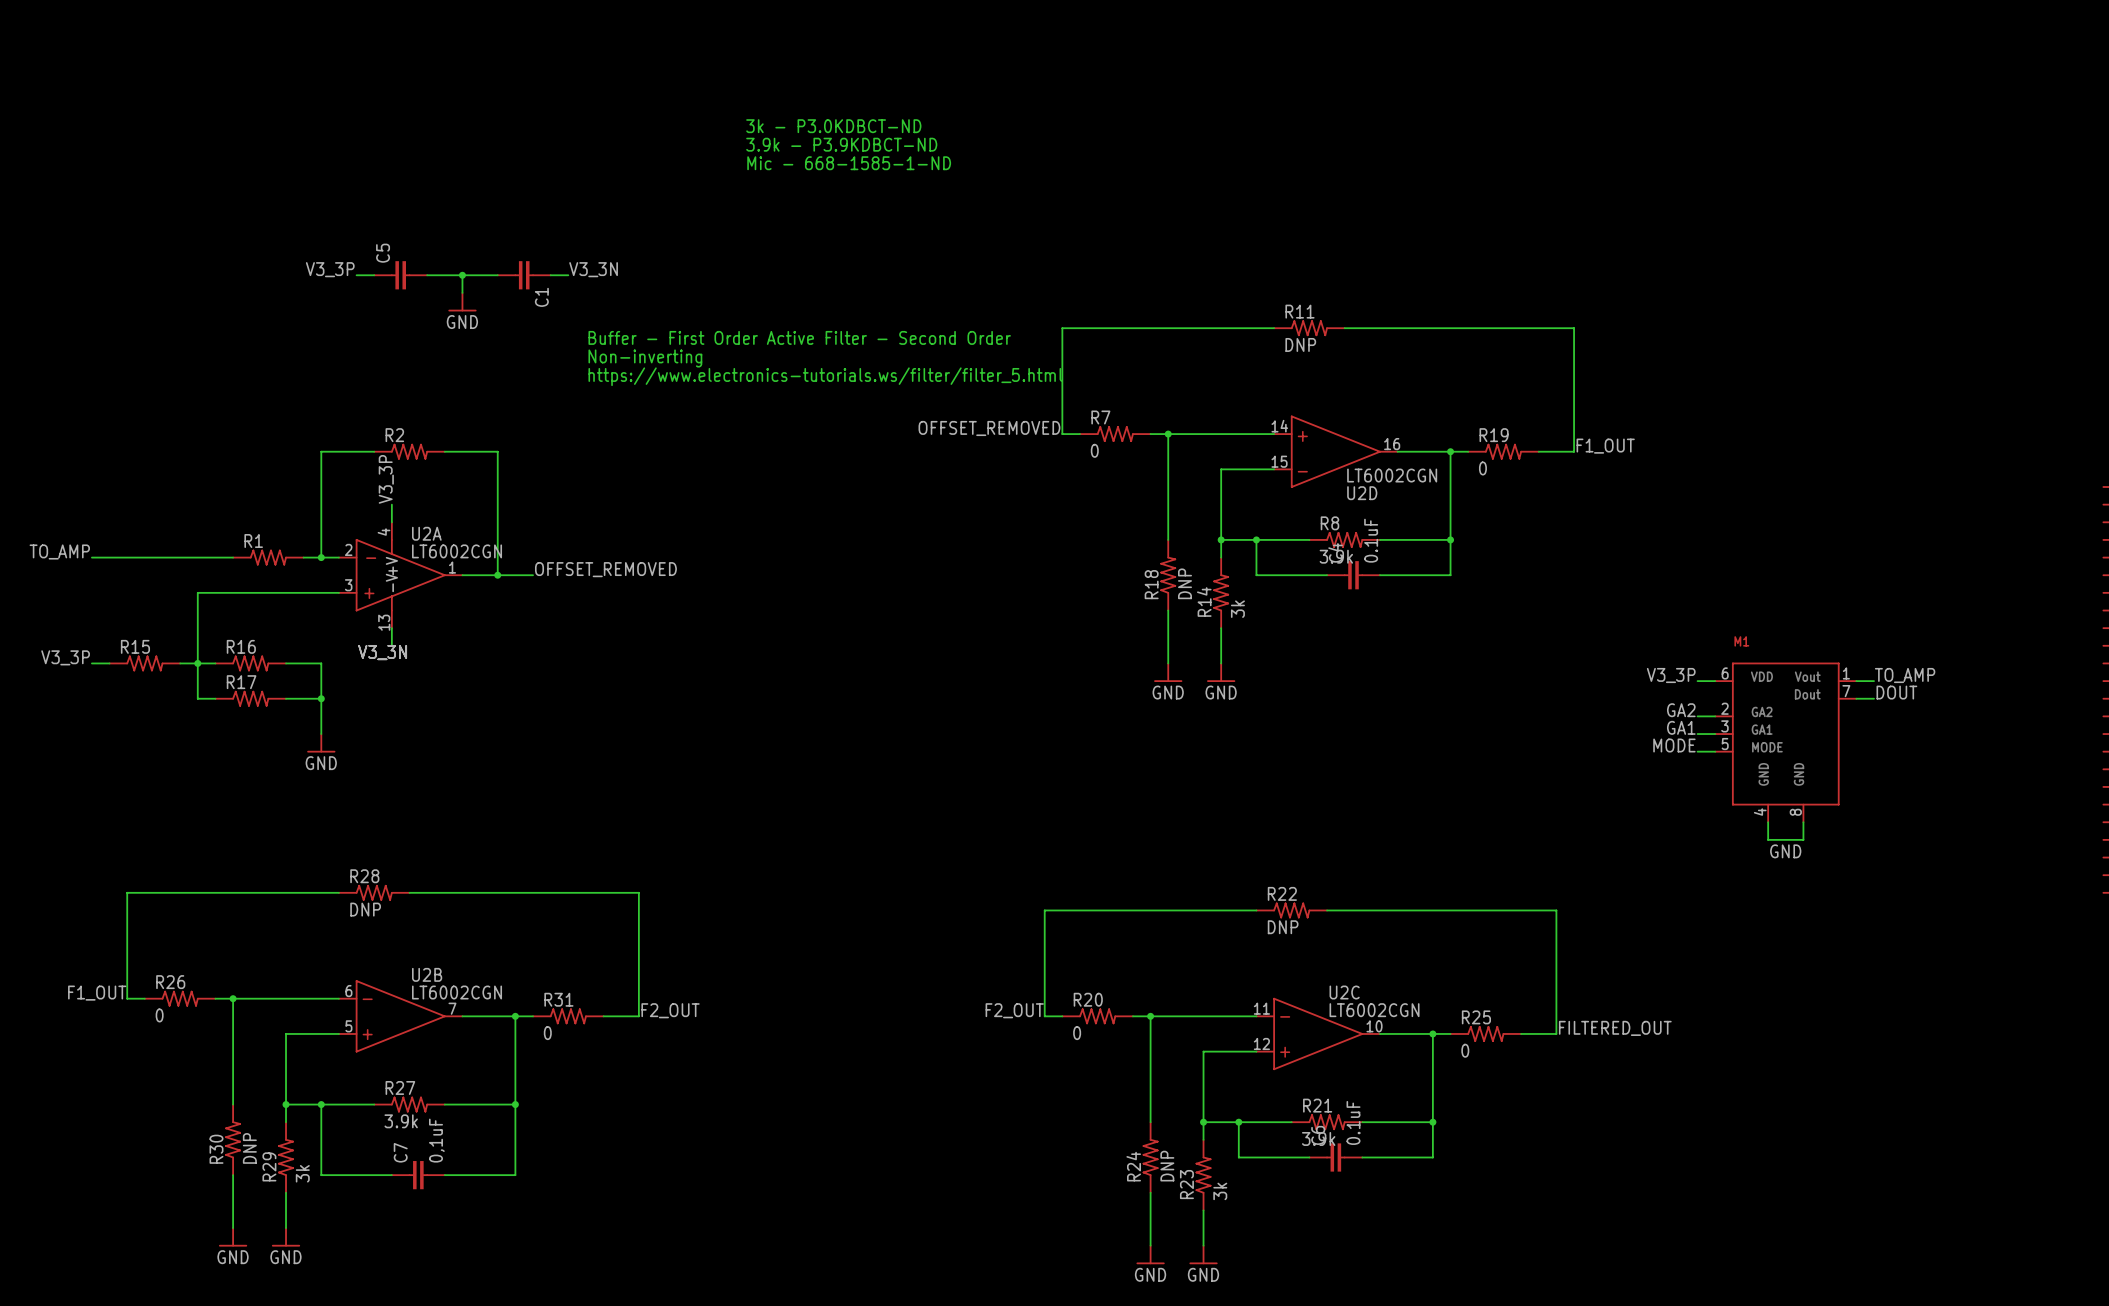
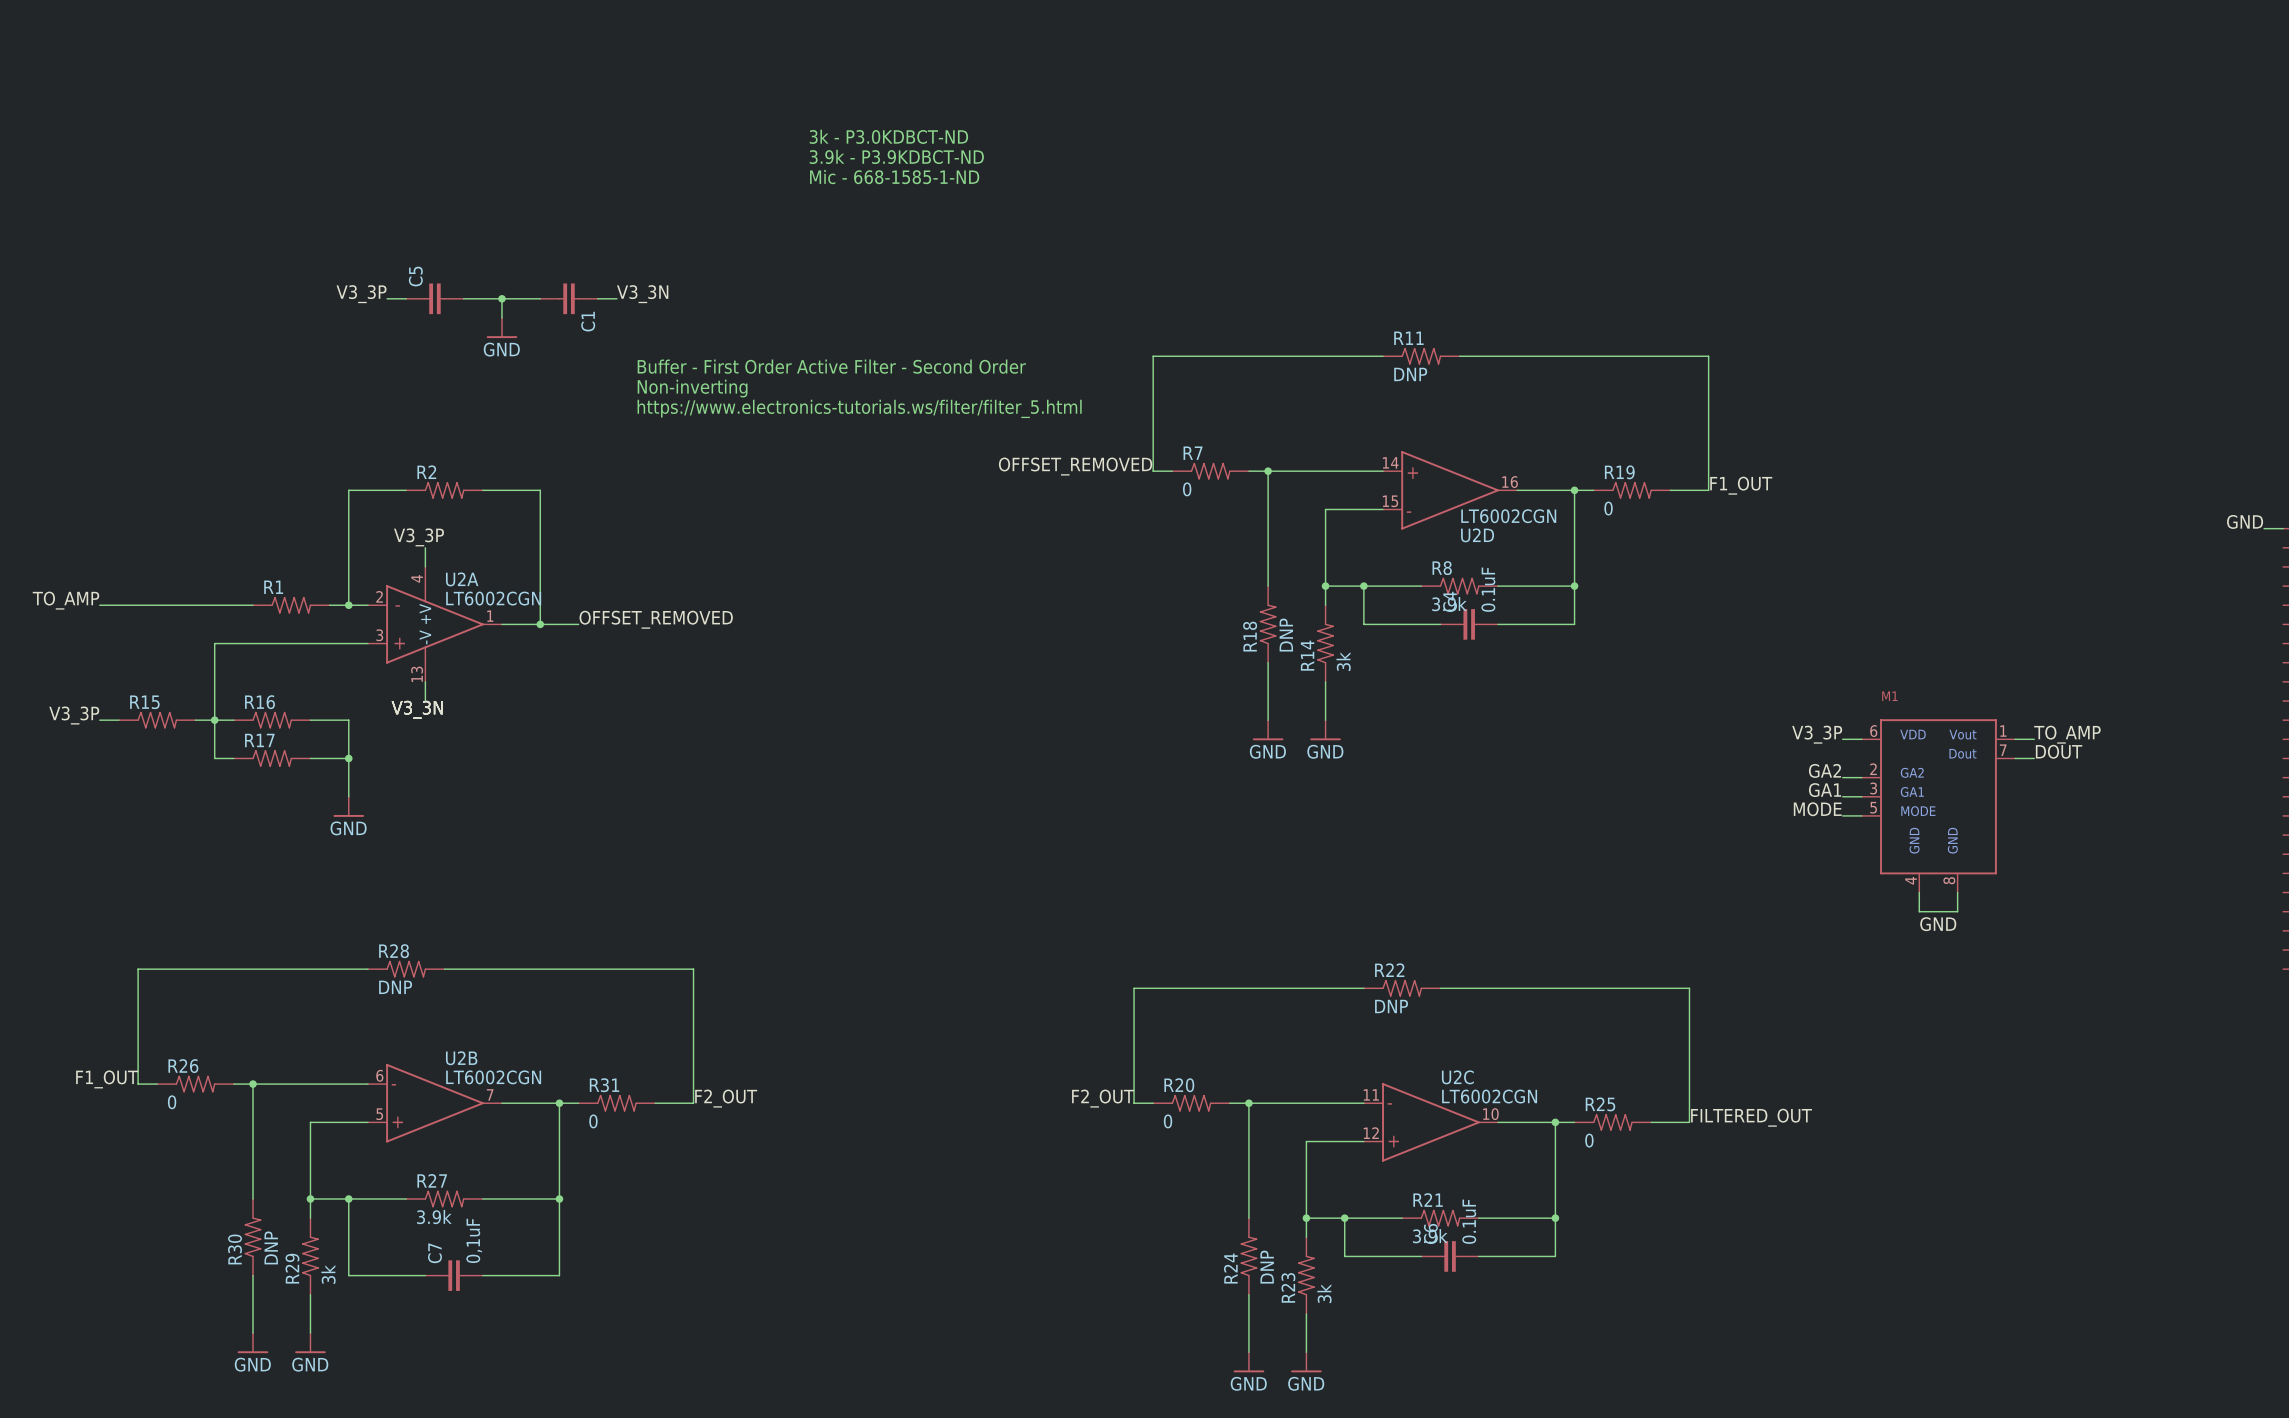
label rotation: 0° (386, 479) -> 90° clockwise (419, 537)
label: none -> GND (2245, 521)
wire: none -> (2264, 528) (2283, 528)

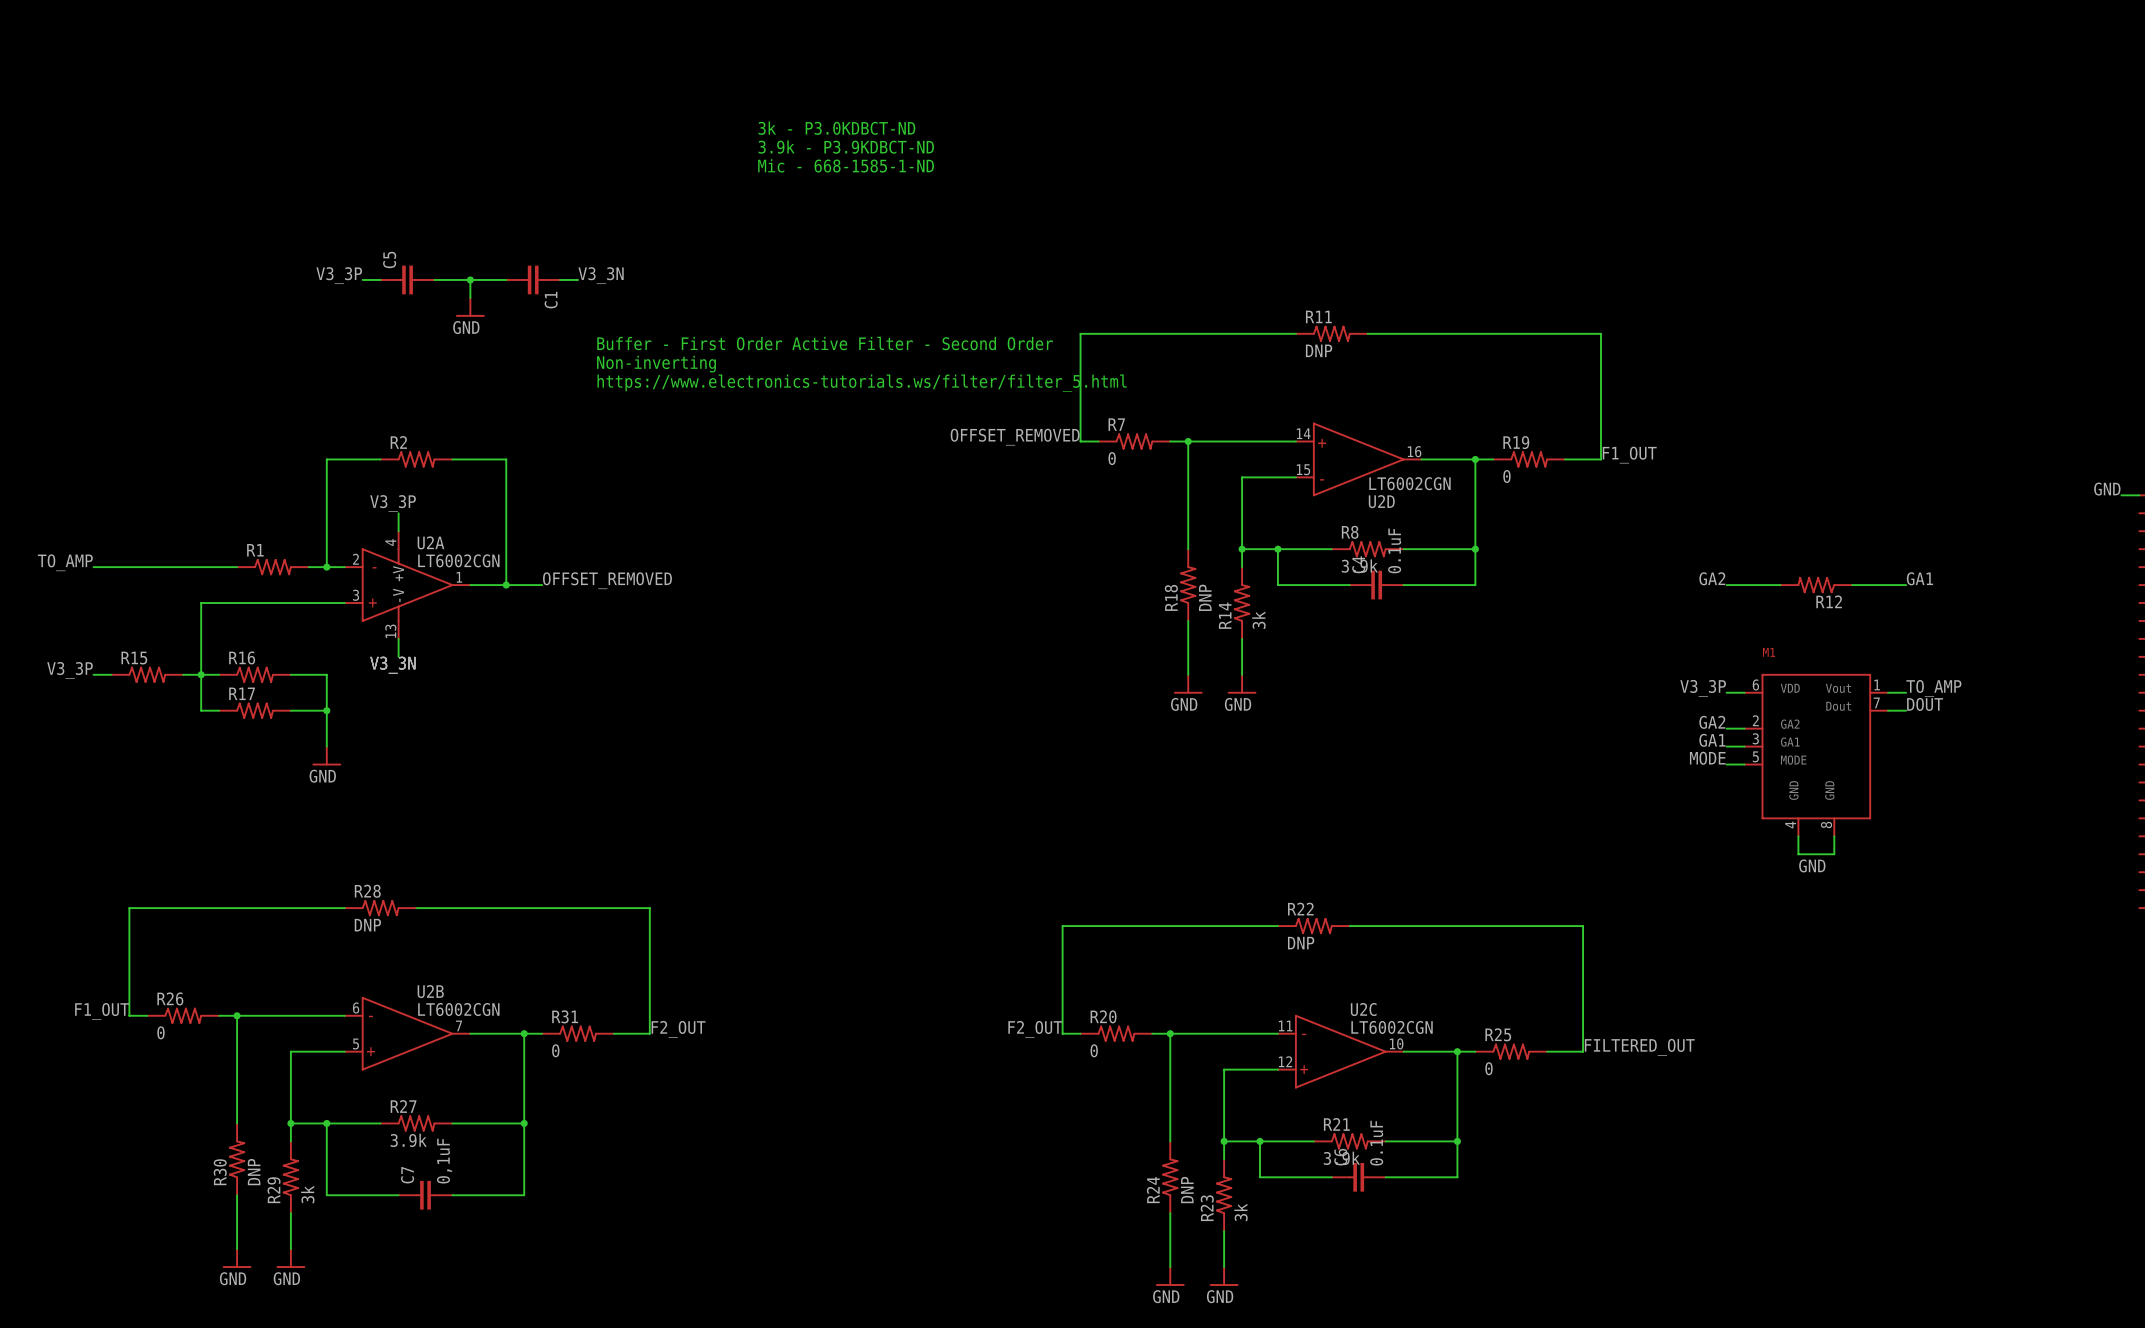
label: none -> GA2 (1712, 578)
label: none -> GA1 (1919, 578)
wire: none -> (1726, 585) (1780, 585)
R12: none -> (1816, 585)
wire: none -> (1852, 585) (1906, 585)

